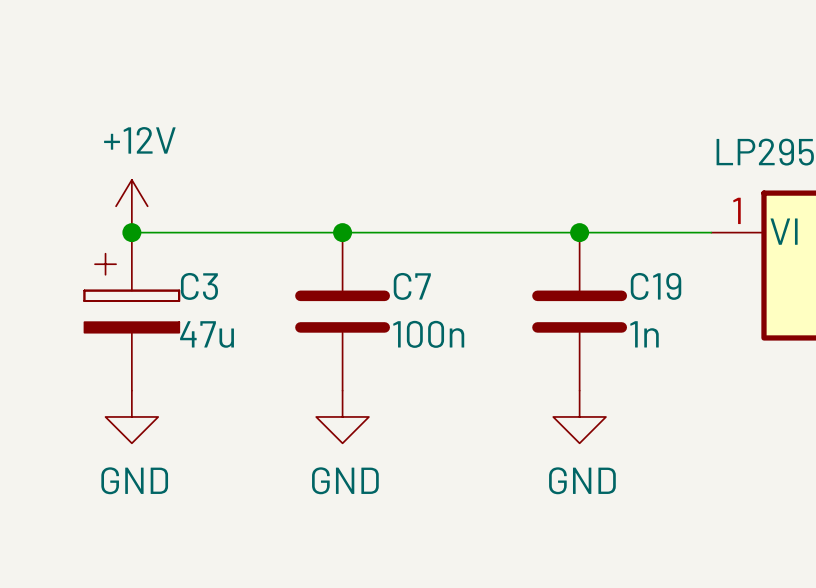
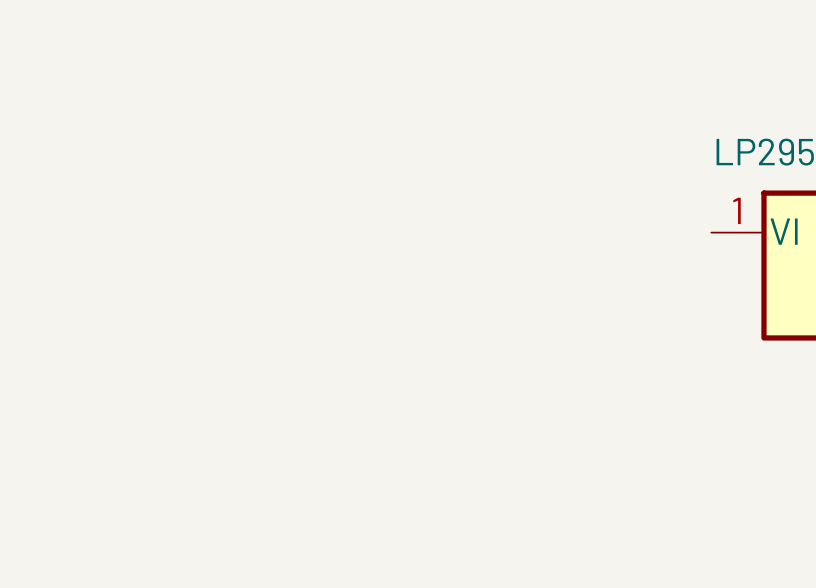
power symbol: +12V (131, 206) -> none
wire: (131, 232) (711, 232) -> none
junction: (131, 232) -> none
junction: (342, 232) -> none
junction: (579, 232) -> none
C3: 47u (131, 311) -> none
C7: 100n (342, 311) -> none
C19: 1n (579, 311) -> none
power symbol: GND (131, 416) -> none
power symbol: GND (342, 416) -> none
power symbol: GND (579, 416) -> none

